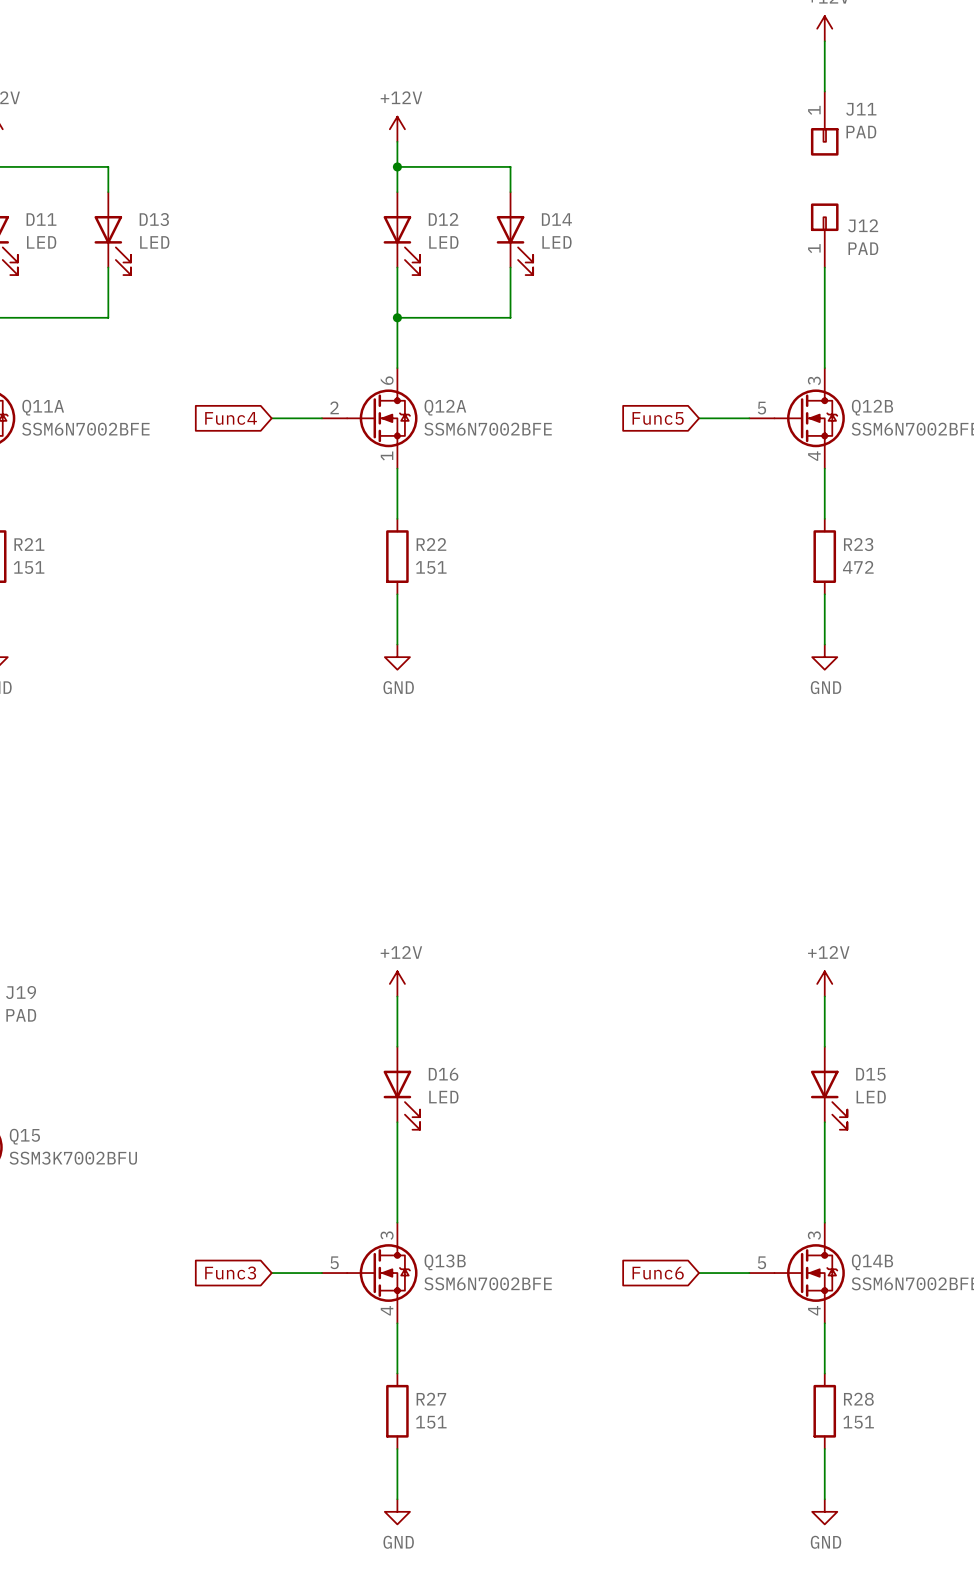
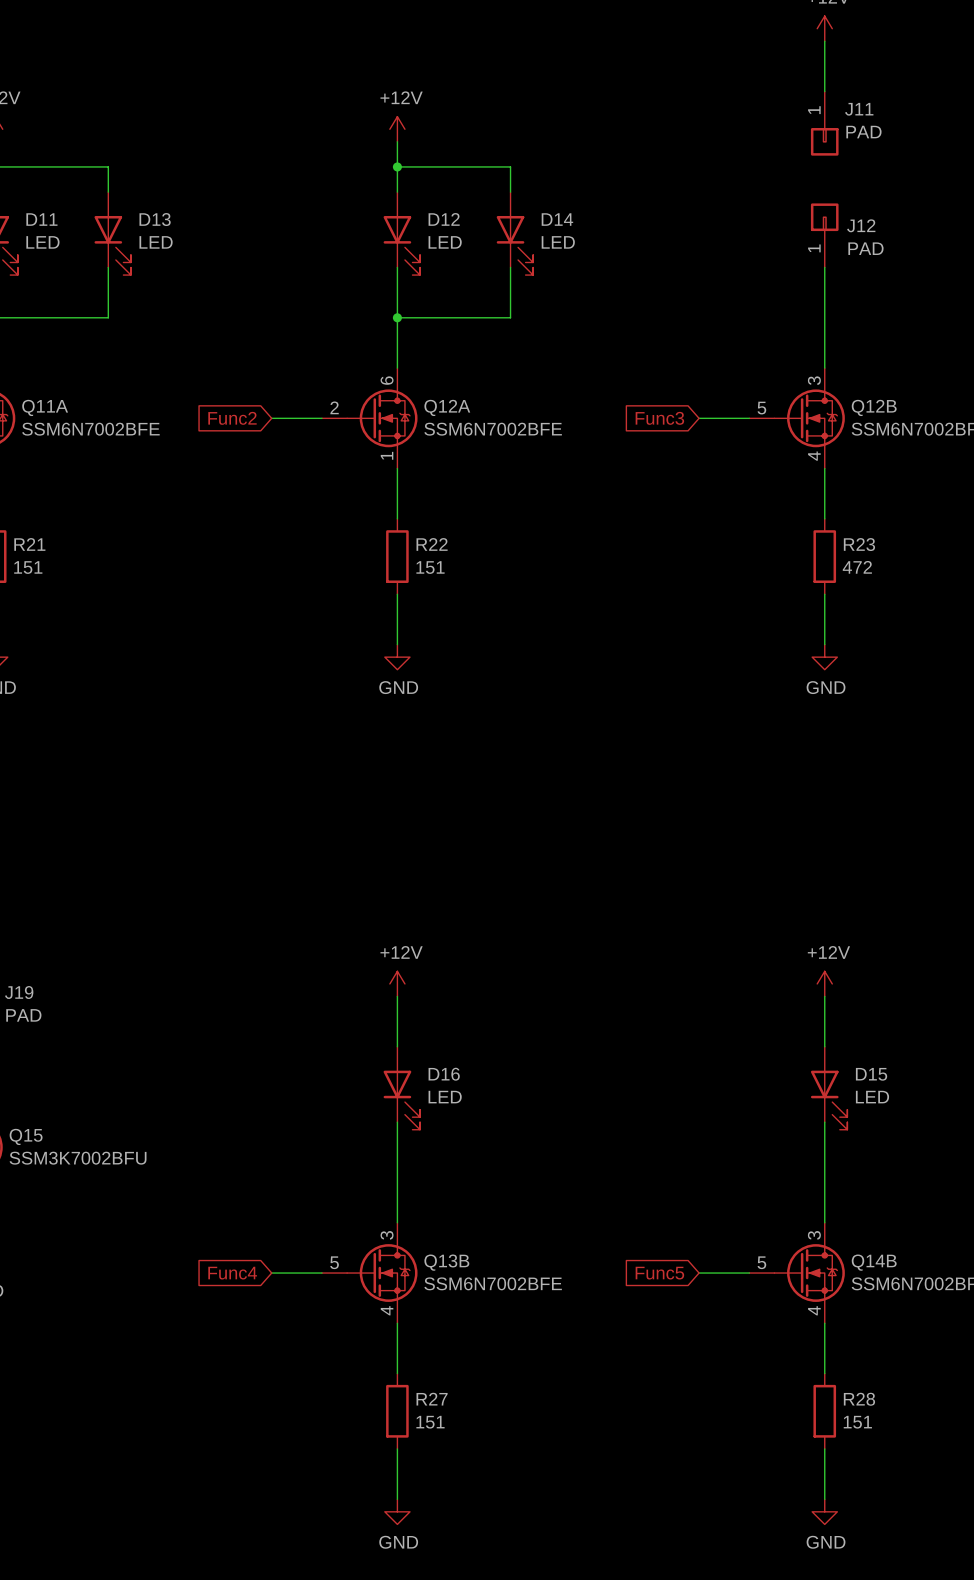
global label: Func4 (231, 418) -> Func2 (232, 418)
global label: Func5 (658, 418) -> Func3 (659, 418)
global label: Func3 (230, 1273) -> Func4 (232, 1273)
global label: Func6 (658, 1273) -> Func5 (659, 1273)

